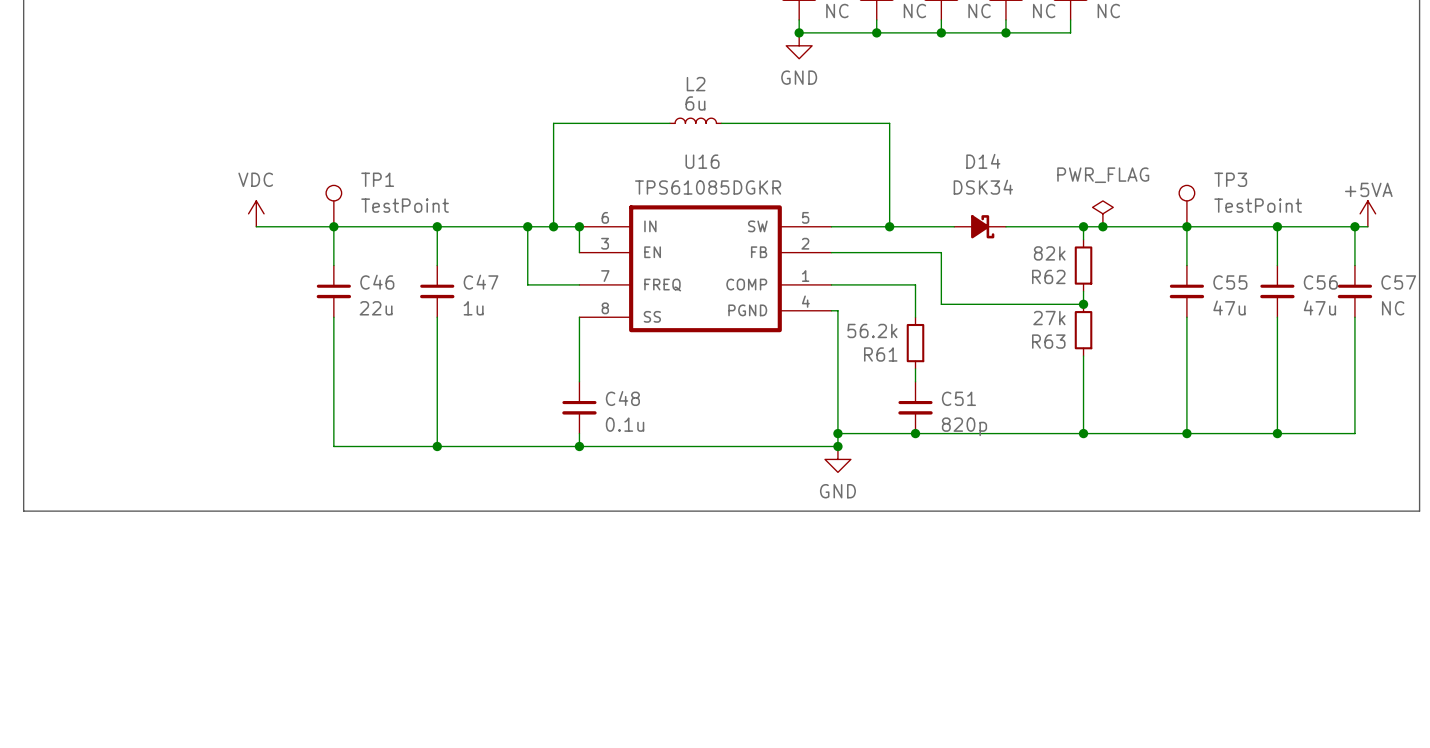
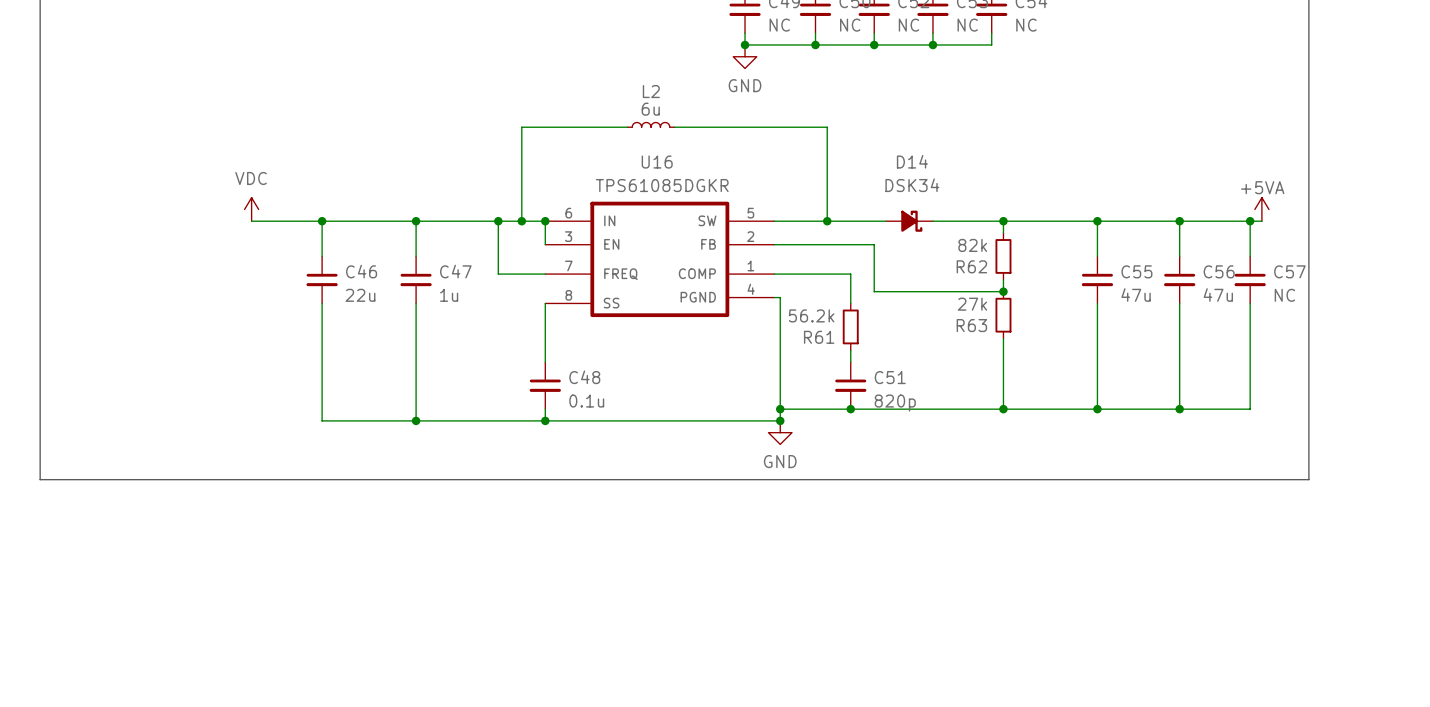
TP1: TestPoint (333, 206) -> none
TP3: TestPoint (1186, 206) -> none
power symbol: PWR_FLAG (1102, 213) -> none
junction: (1102, 226) -> none

